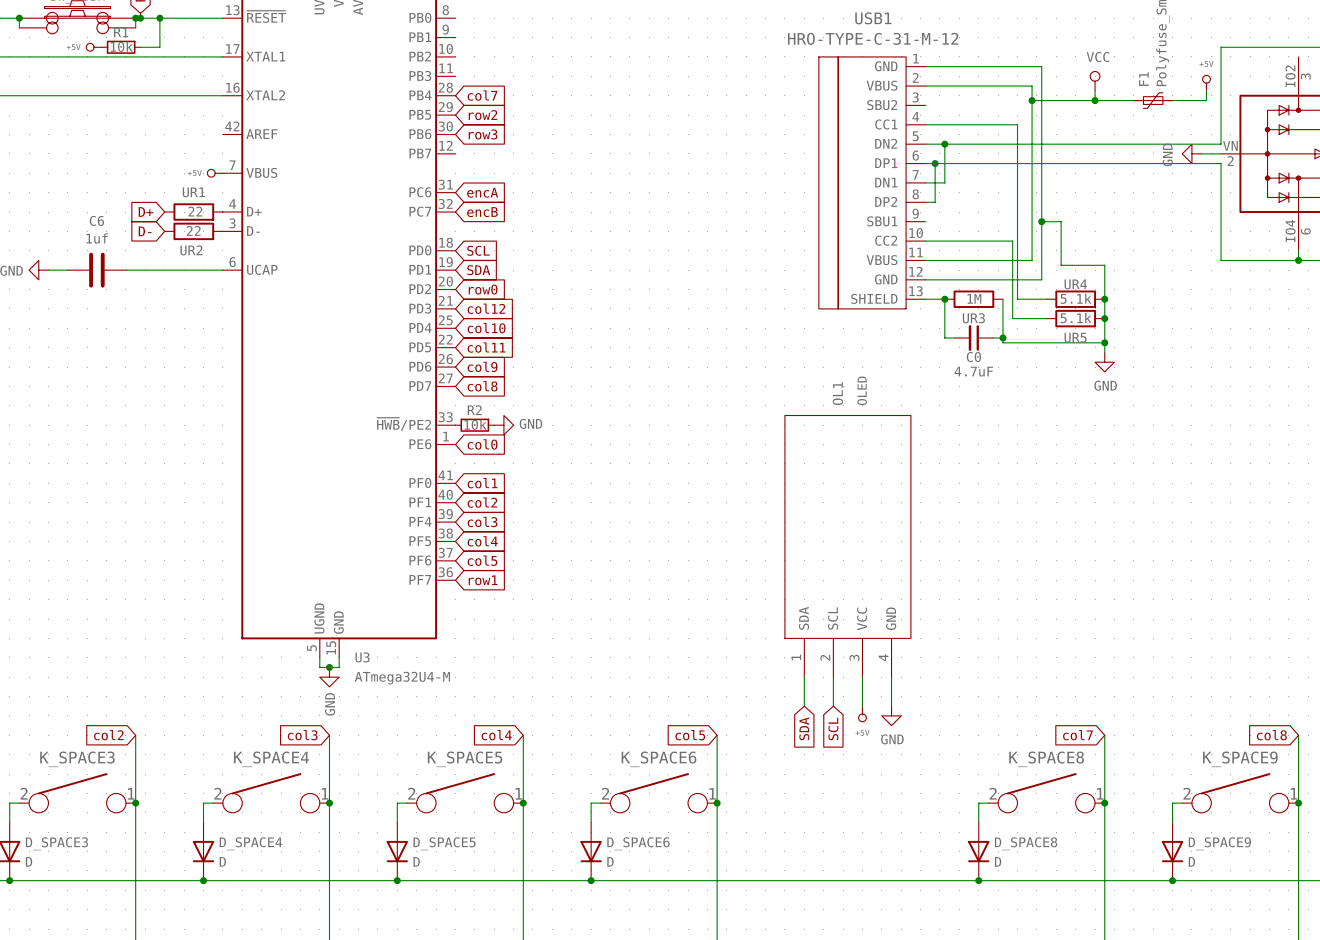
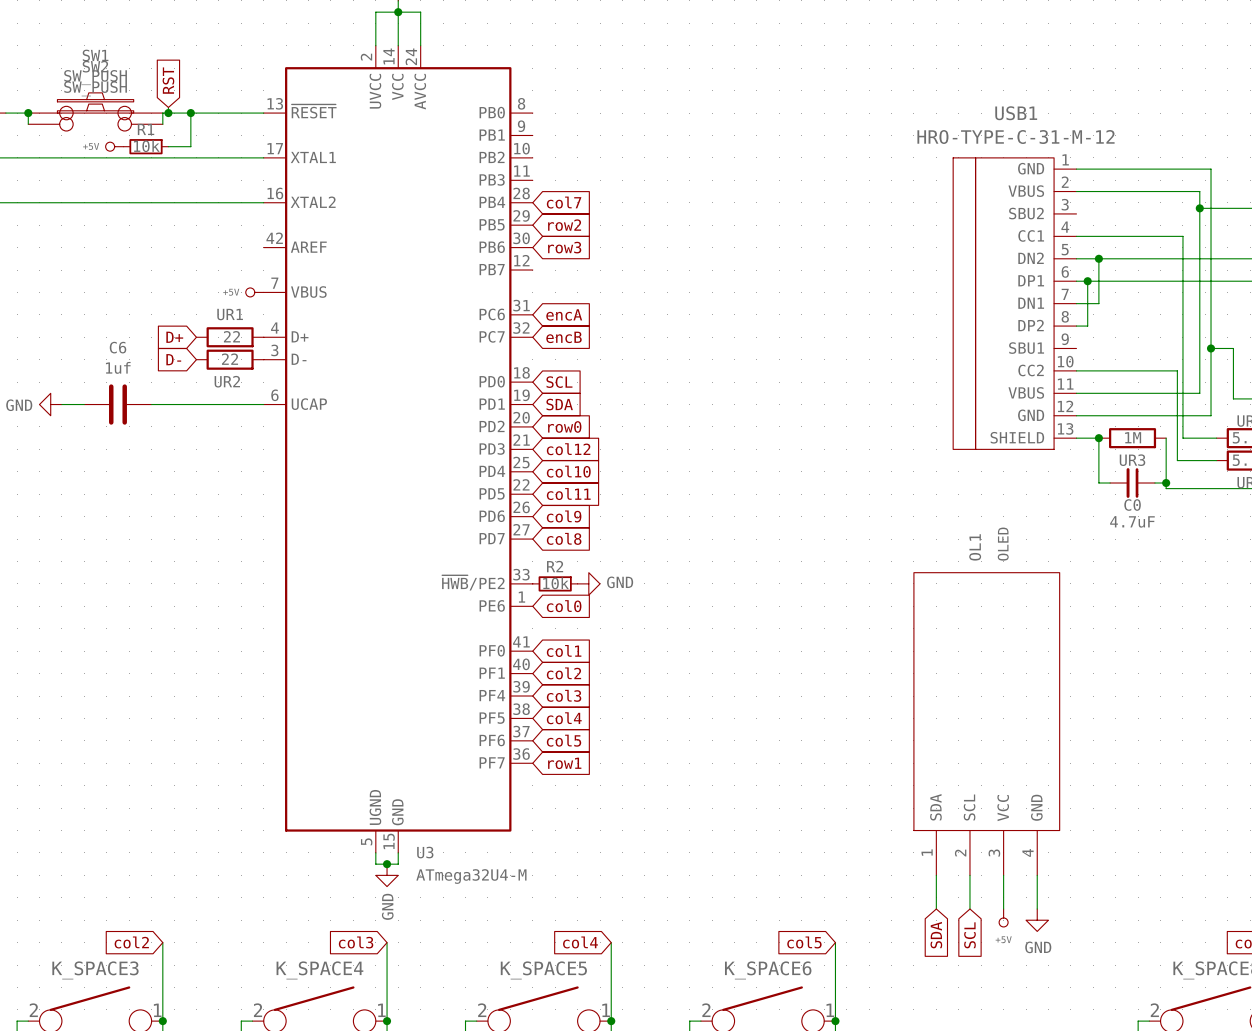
junction: (135, 18) -> none

